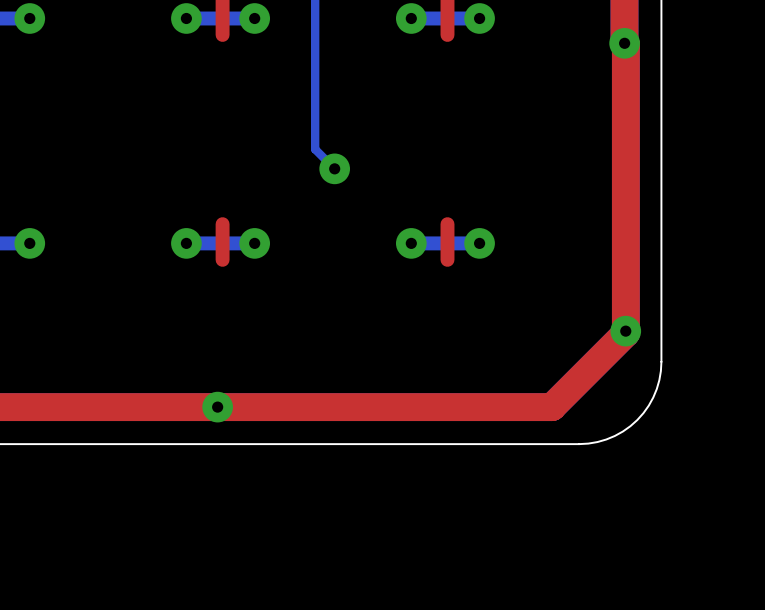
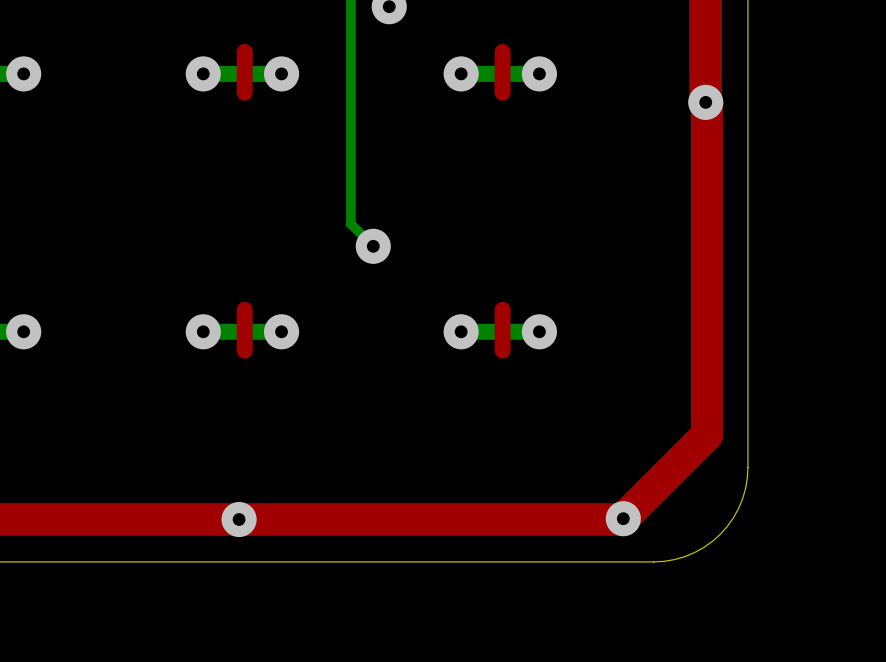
via position: (625, 331) -> (623, 518)

